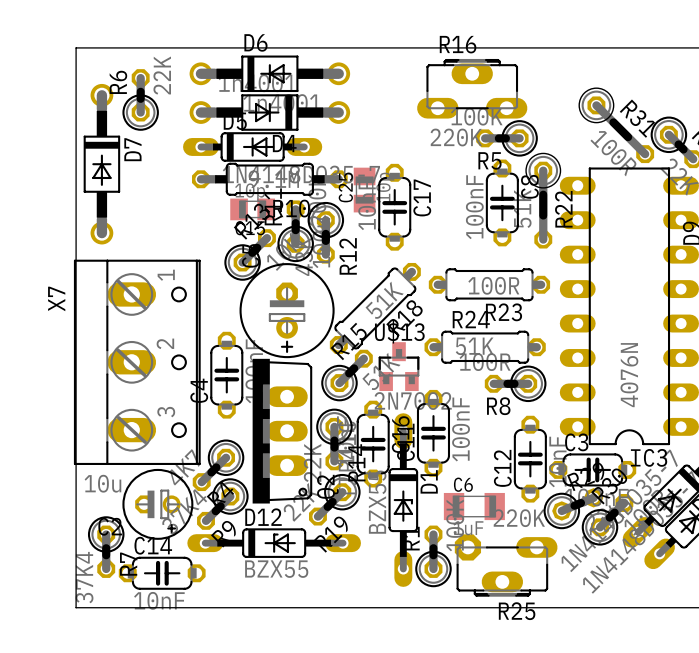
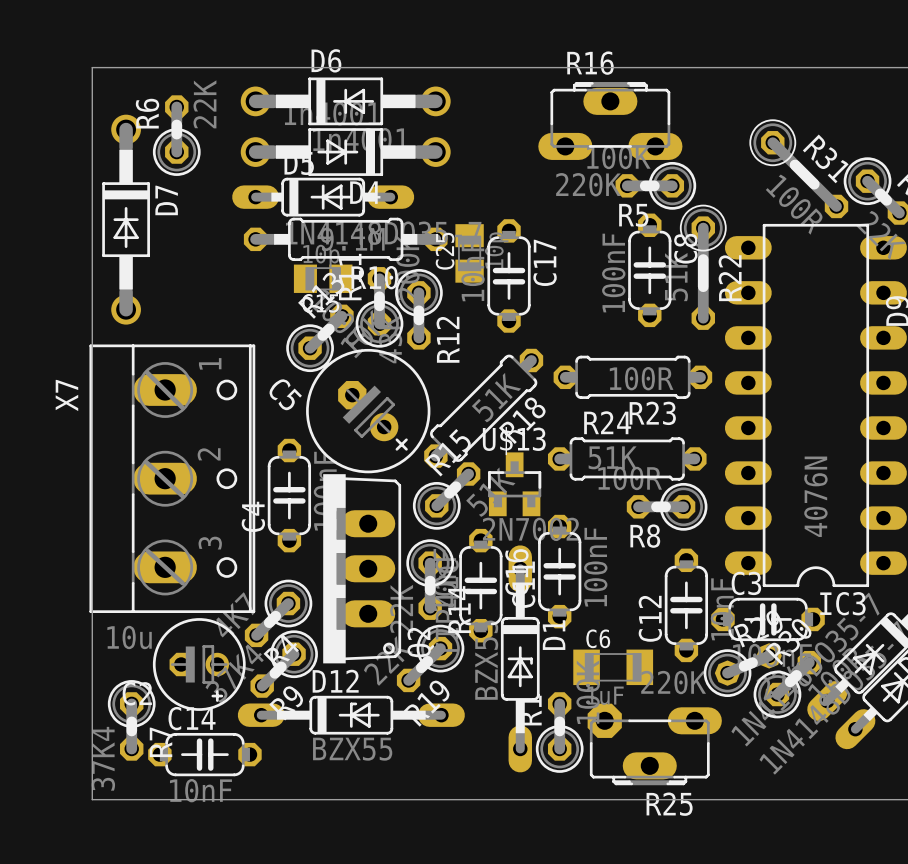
C5 rotation: 0° (287, 310) -> 45° counterclockwise (368, 411)

